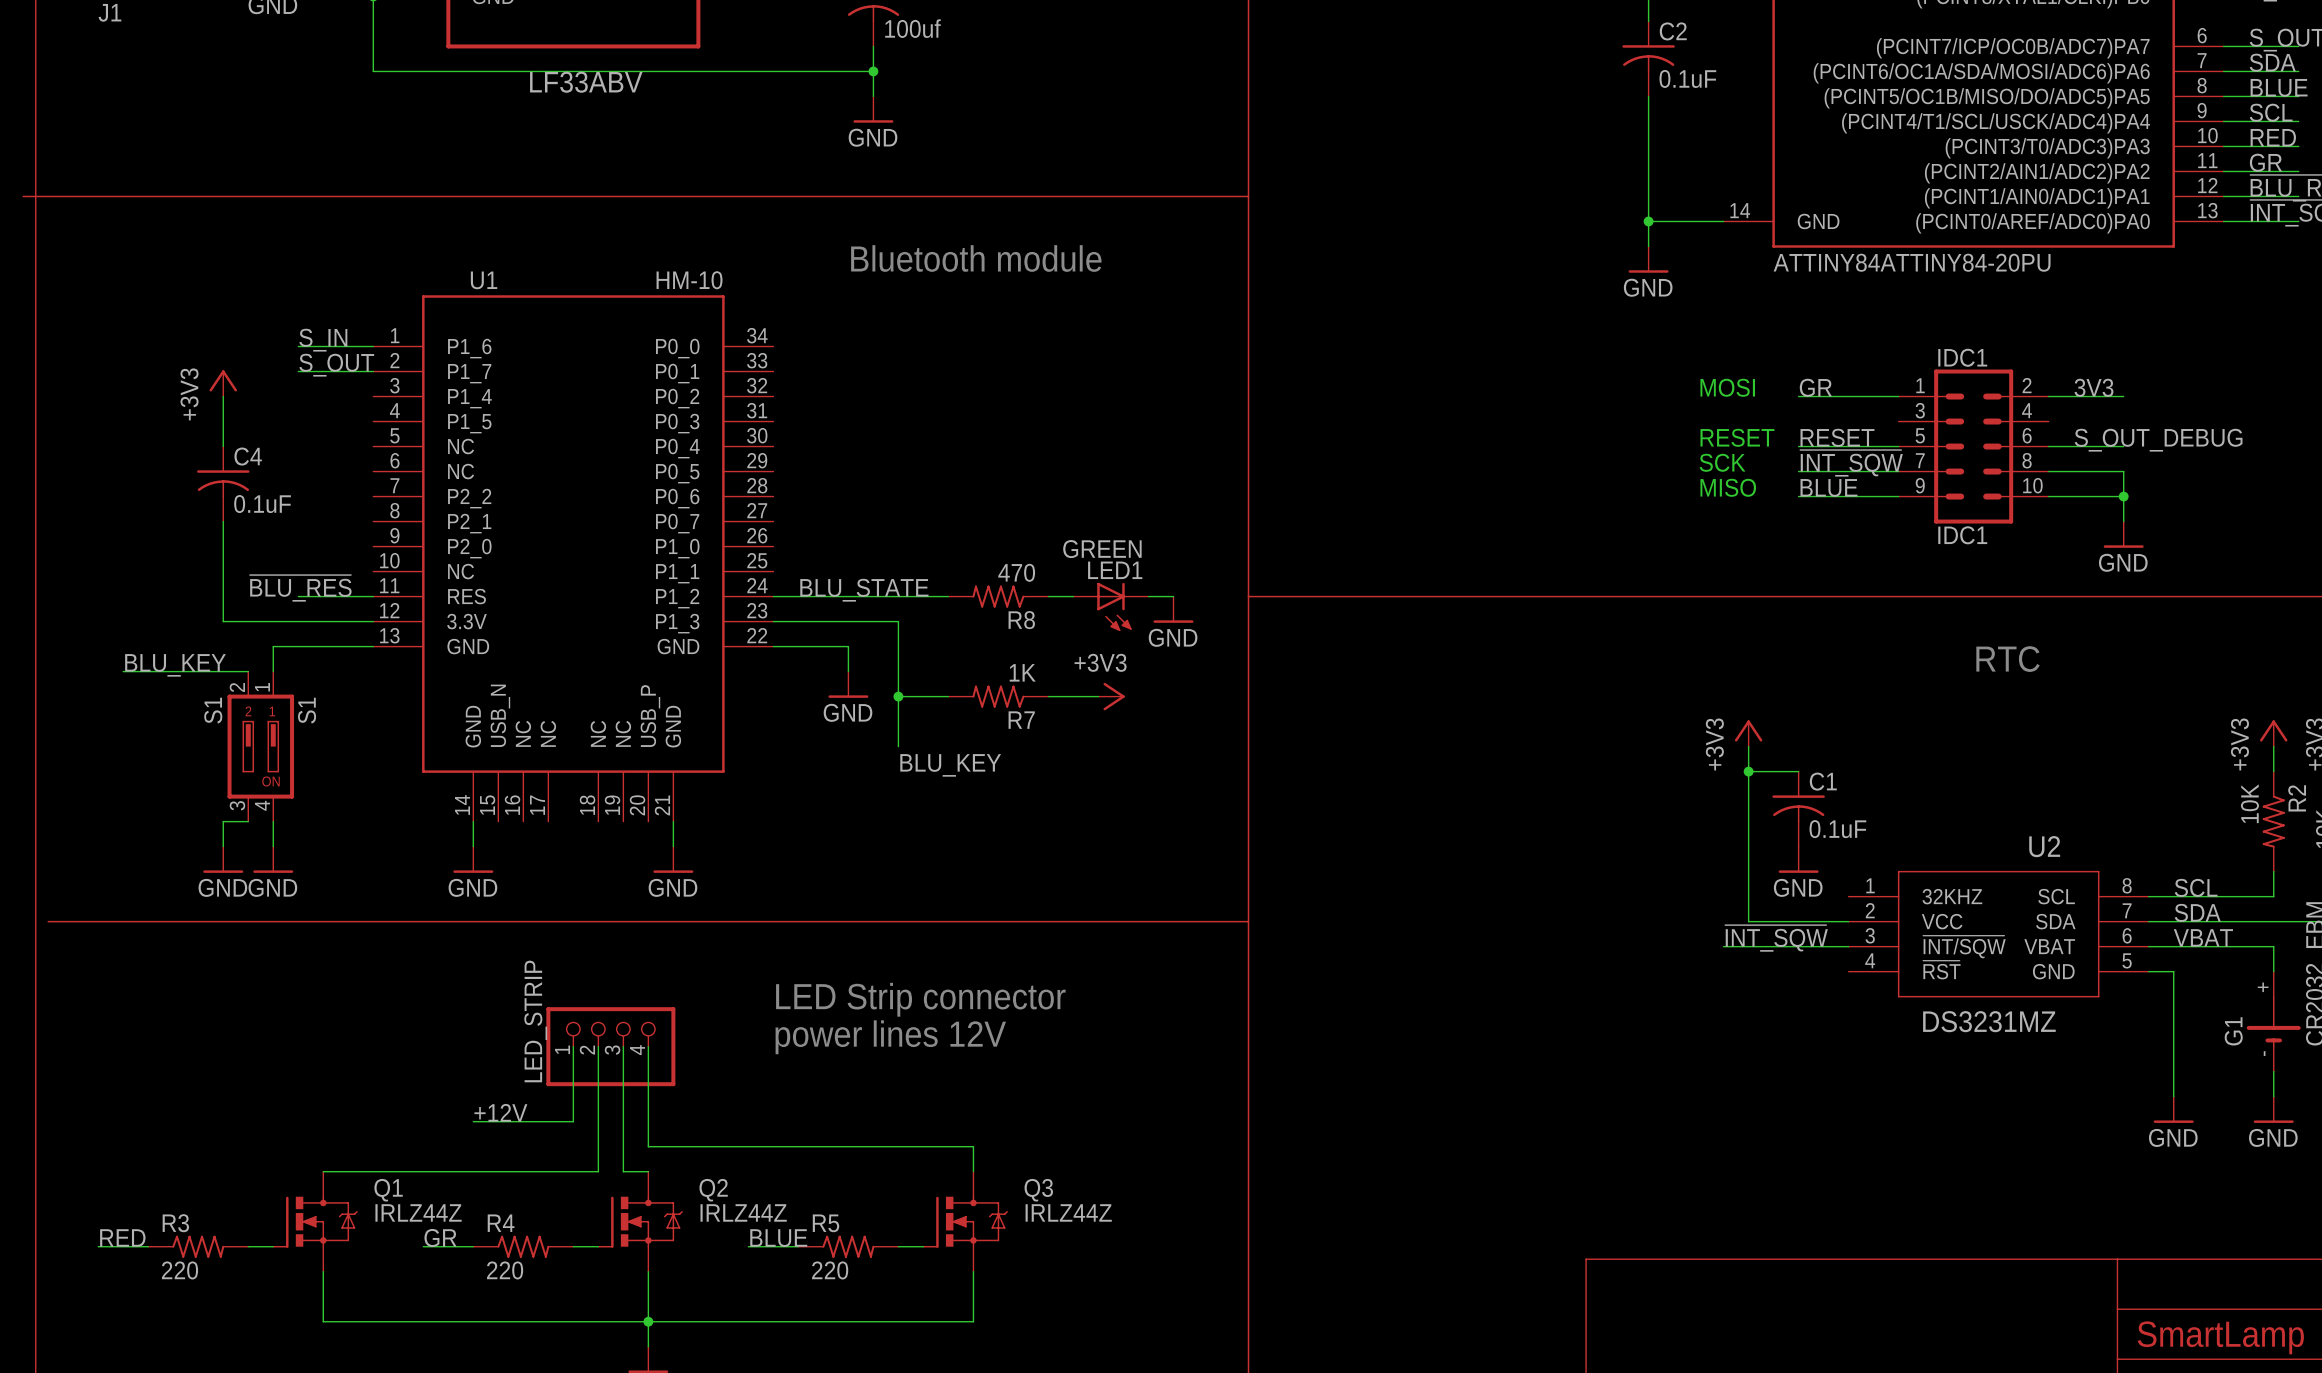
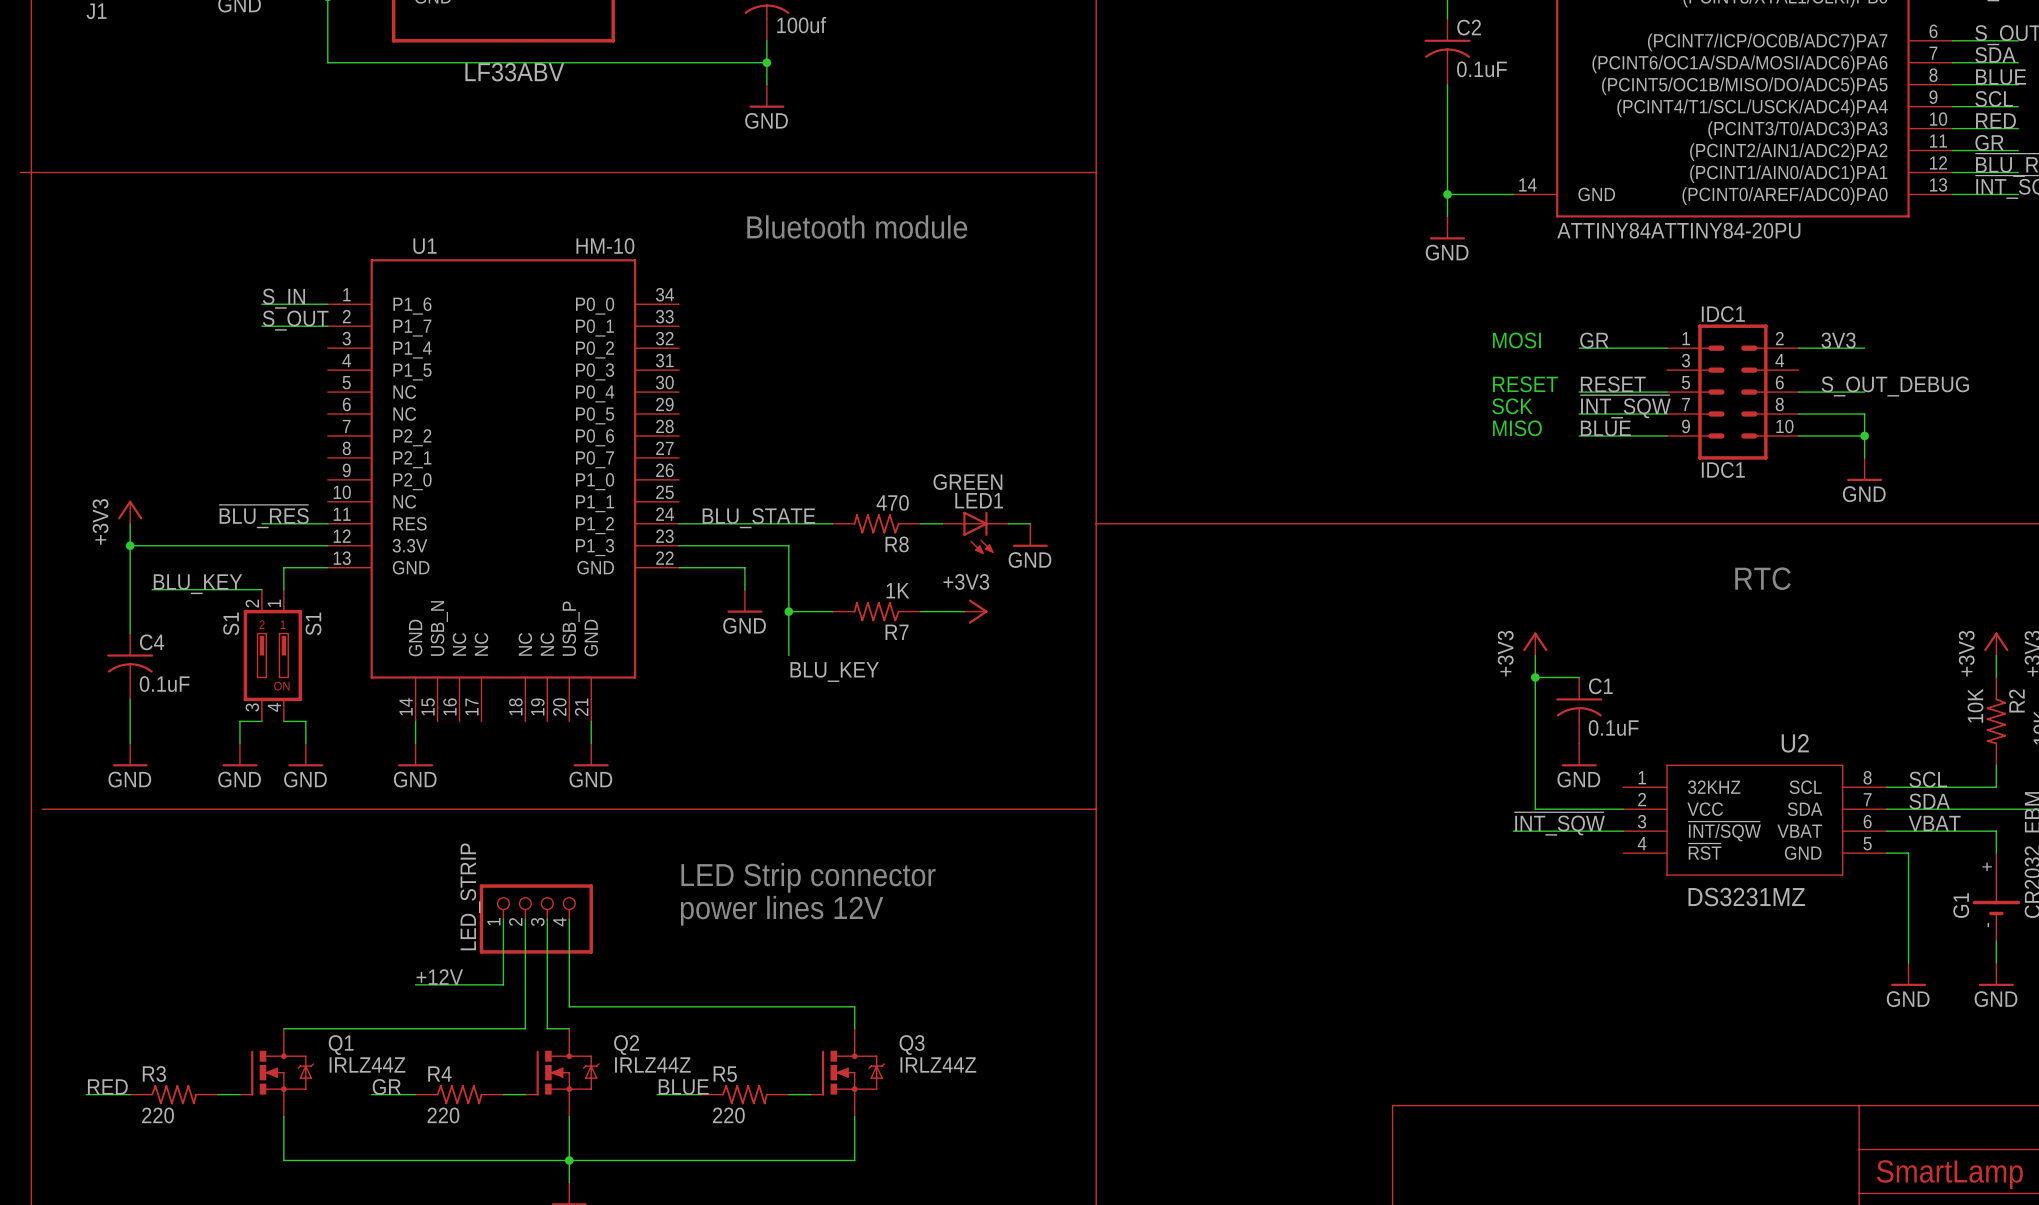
power symbol position: +3V3 (223, 383) -> +3V3 (130, 512)
wire: (223, 396) (223, 446) -> none
C4 position: (223, 484) -> (130, 666)
wire: (223, 521) (223, 621) -> (130, 545) (196, 545)
wire: none -> (130, 523) (130, 633)
junction: none -> (130, 545)
wire: (323, 646) (273, 646) (273, 671) -> (283, 567) (283, 589)
label position: BLU_KEY (175, 665) -> BLU_KEY (197, 584)
wire: (123, 671) (173, 671) -> (218, 589) (261, 589)
S1 position: (260, 746) -> (272, 655)
wire: none -> (130, 699) (130, 743)
wire: (248, 821) (223, 821) (223, 846) -> none
wire: none -> (239, 721) (261, 721)
wire: none -> (283, 721) (305, 721) (305, 743)
power symbol: none -> GND (130, 754)
power symbol: GND (223, 859) -> none
power symbol: none -> GND (305, 754)

